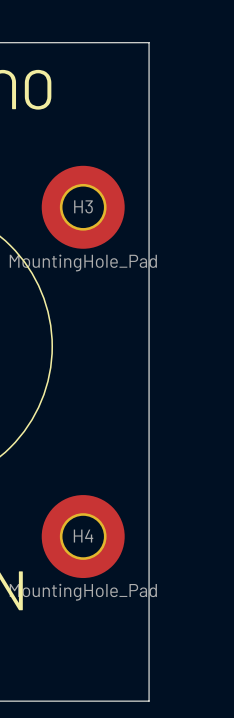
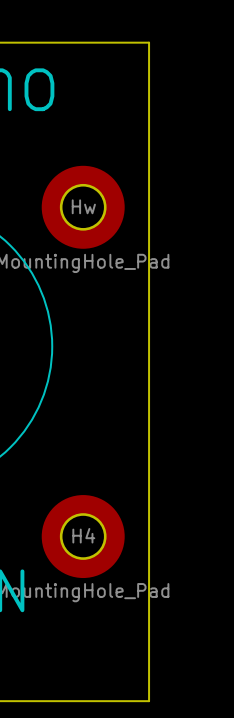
H3 name: H3 (83, 206) -> Hw (83, 206)

